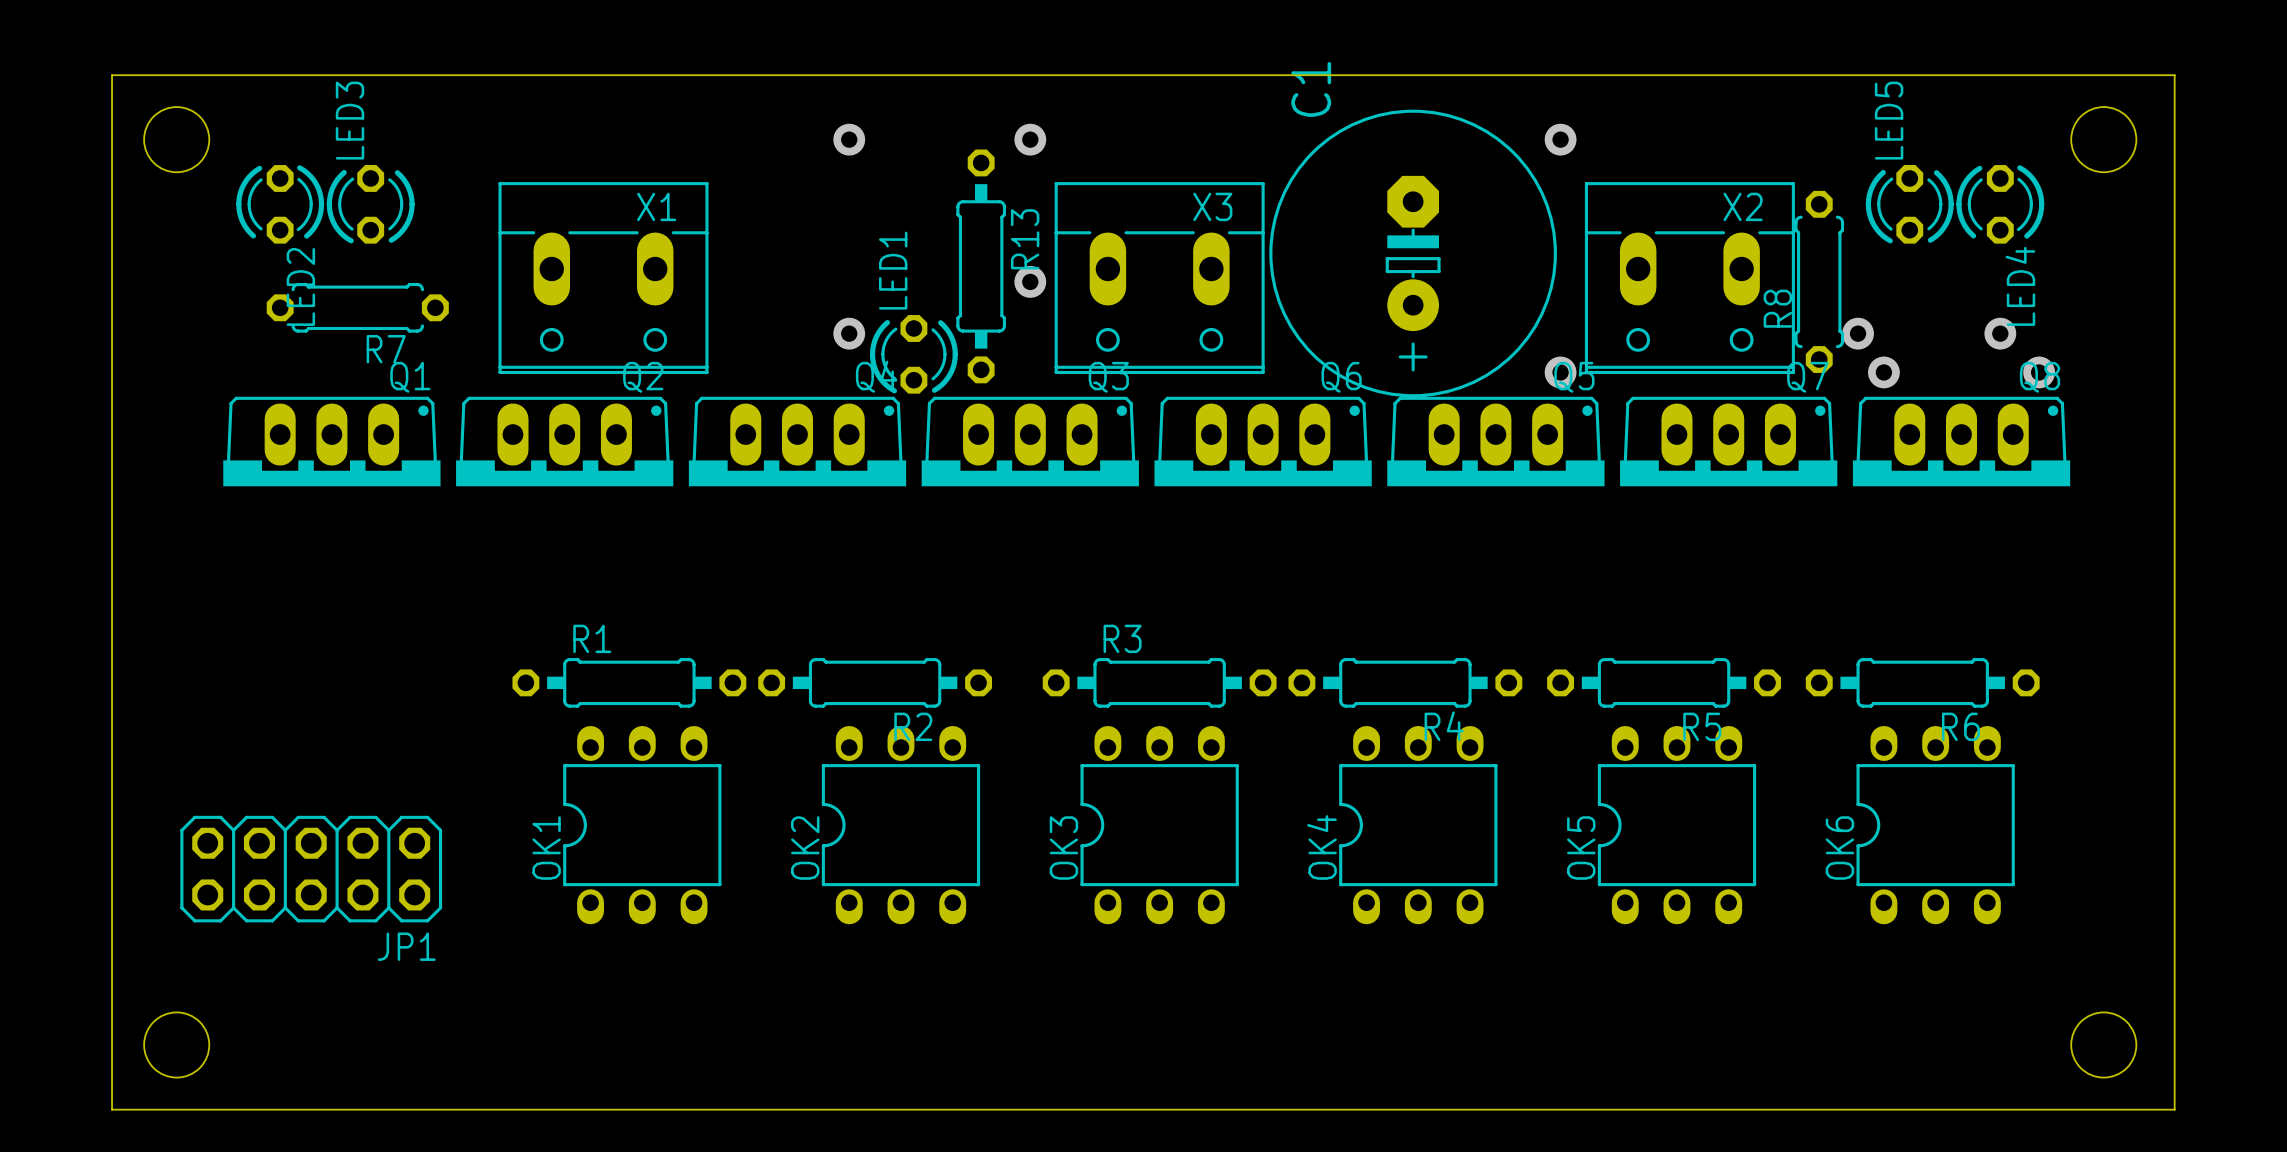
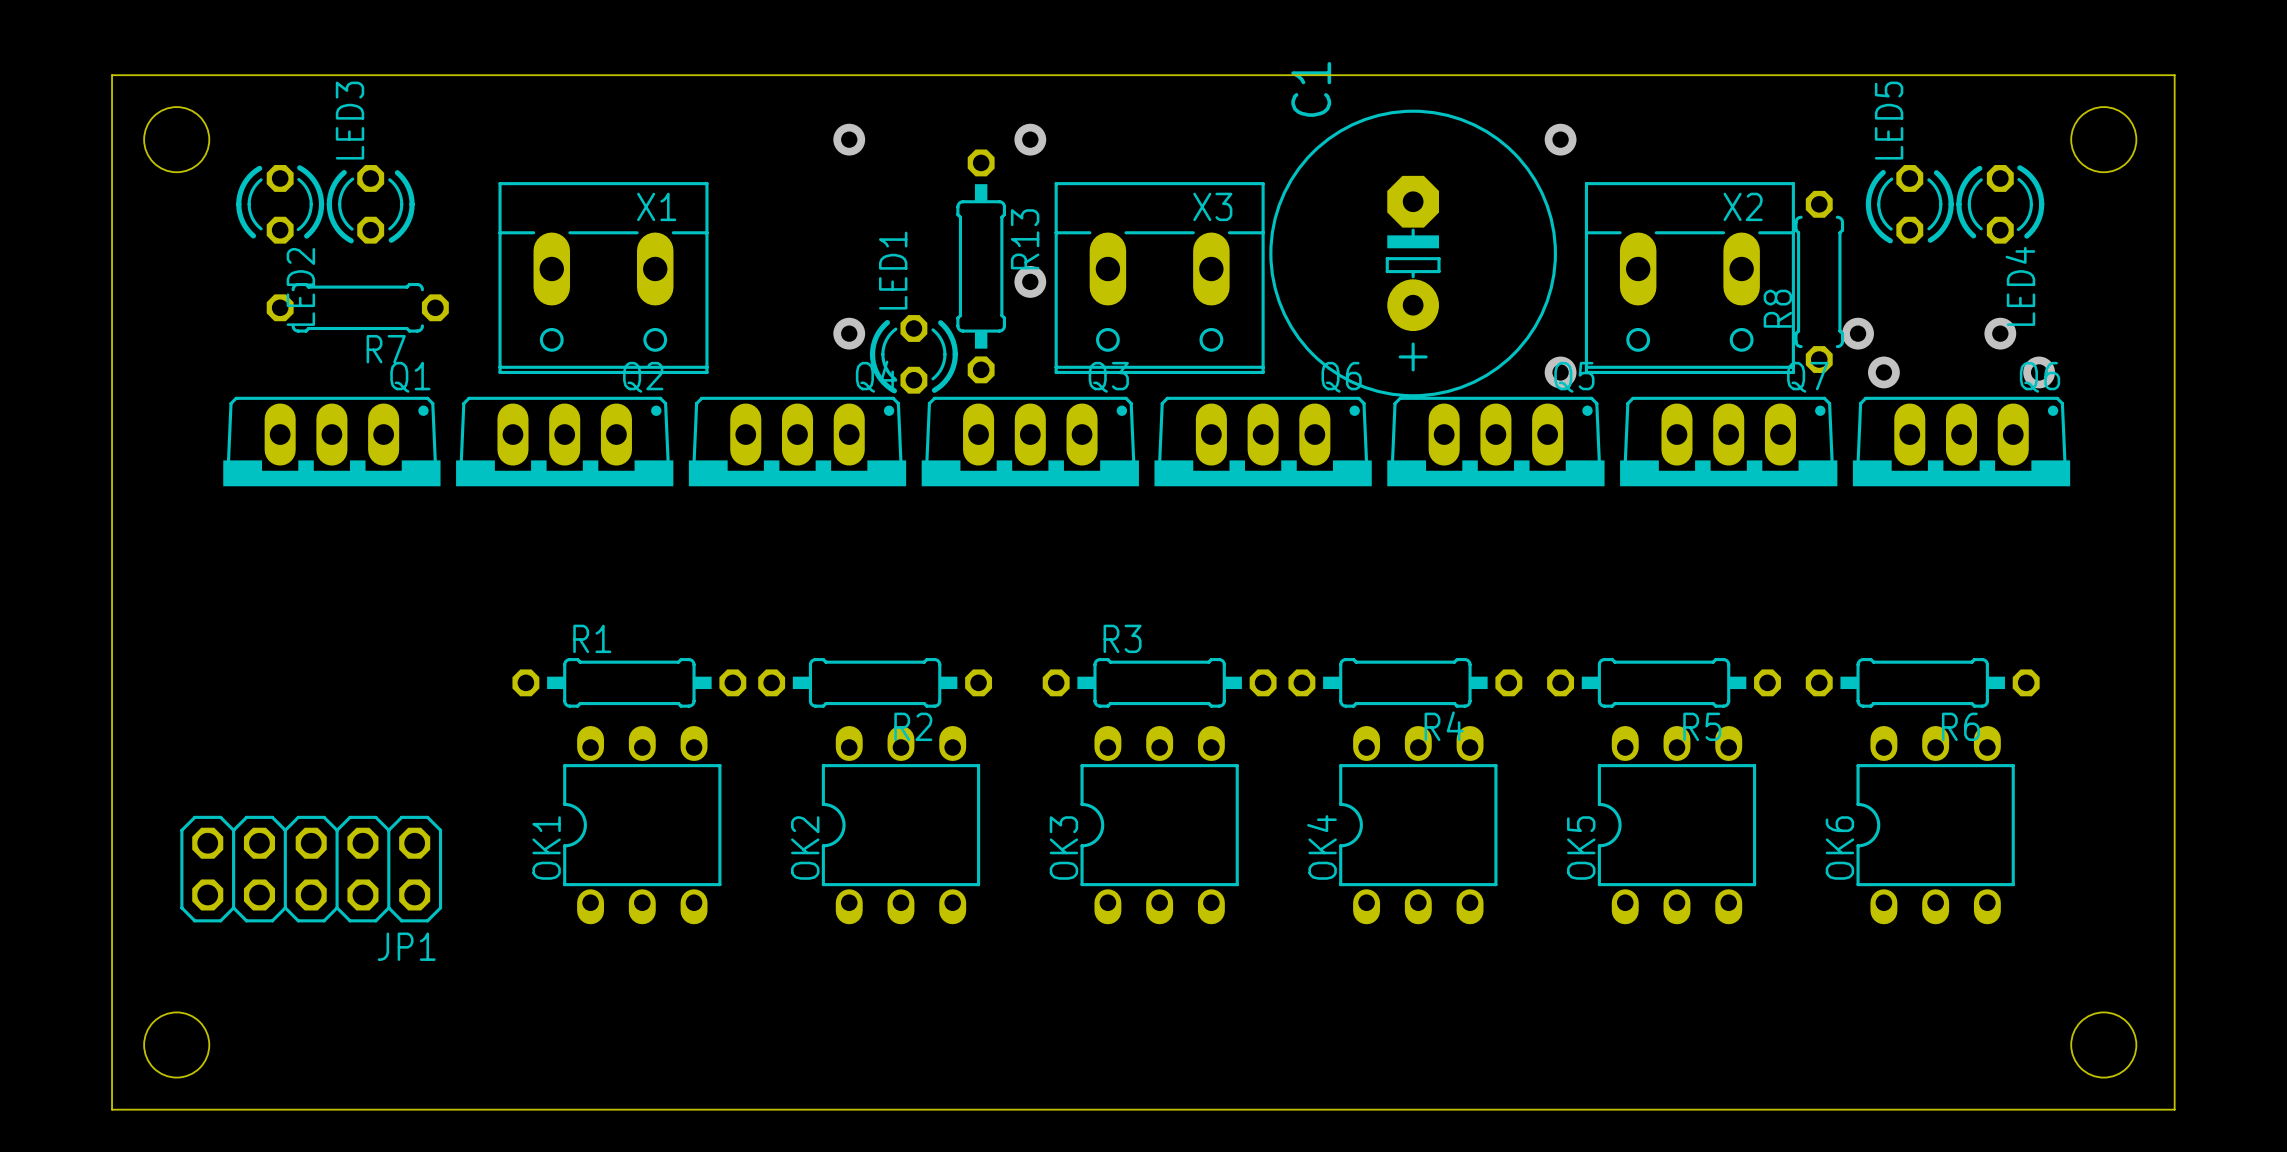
Q8 name: Q8 (2040, 377) -> Q6 (2040, 377)

